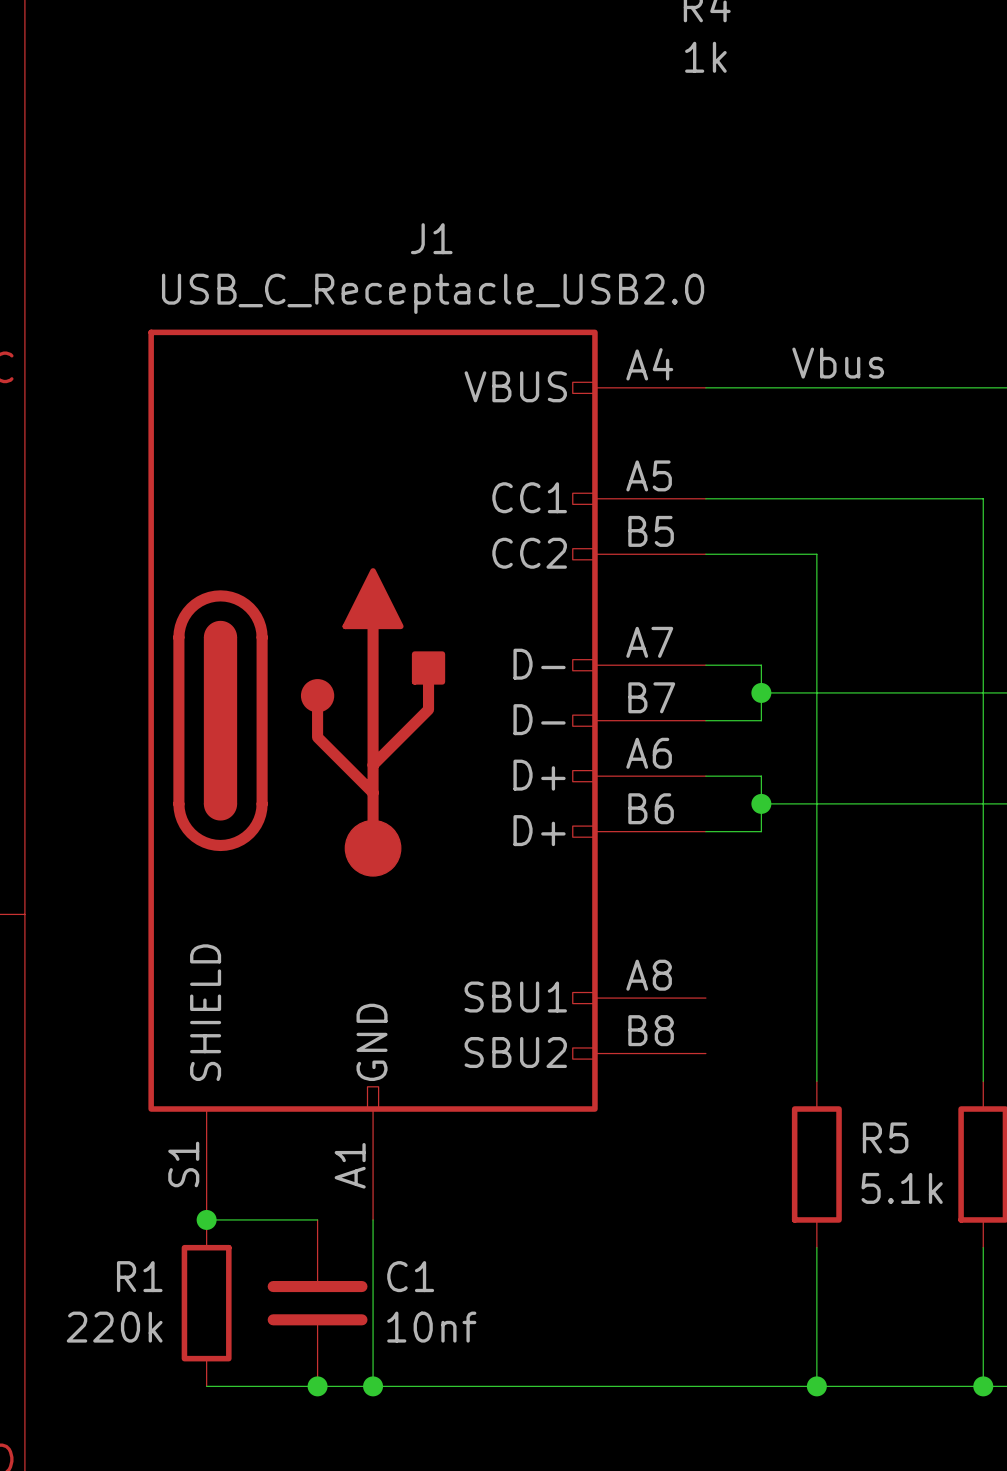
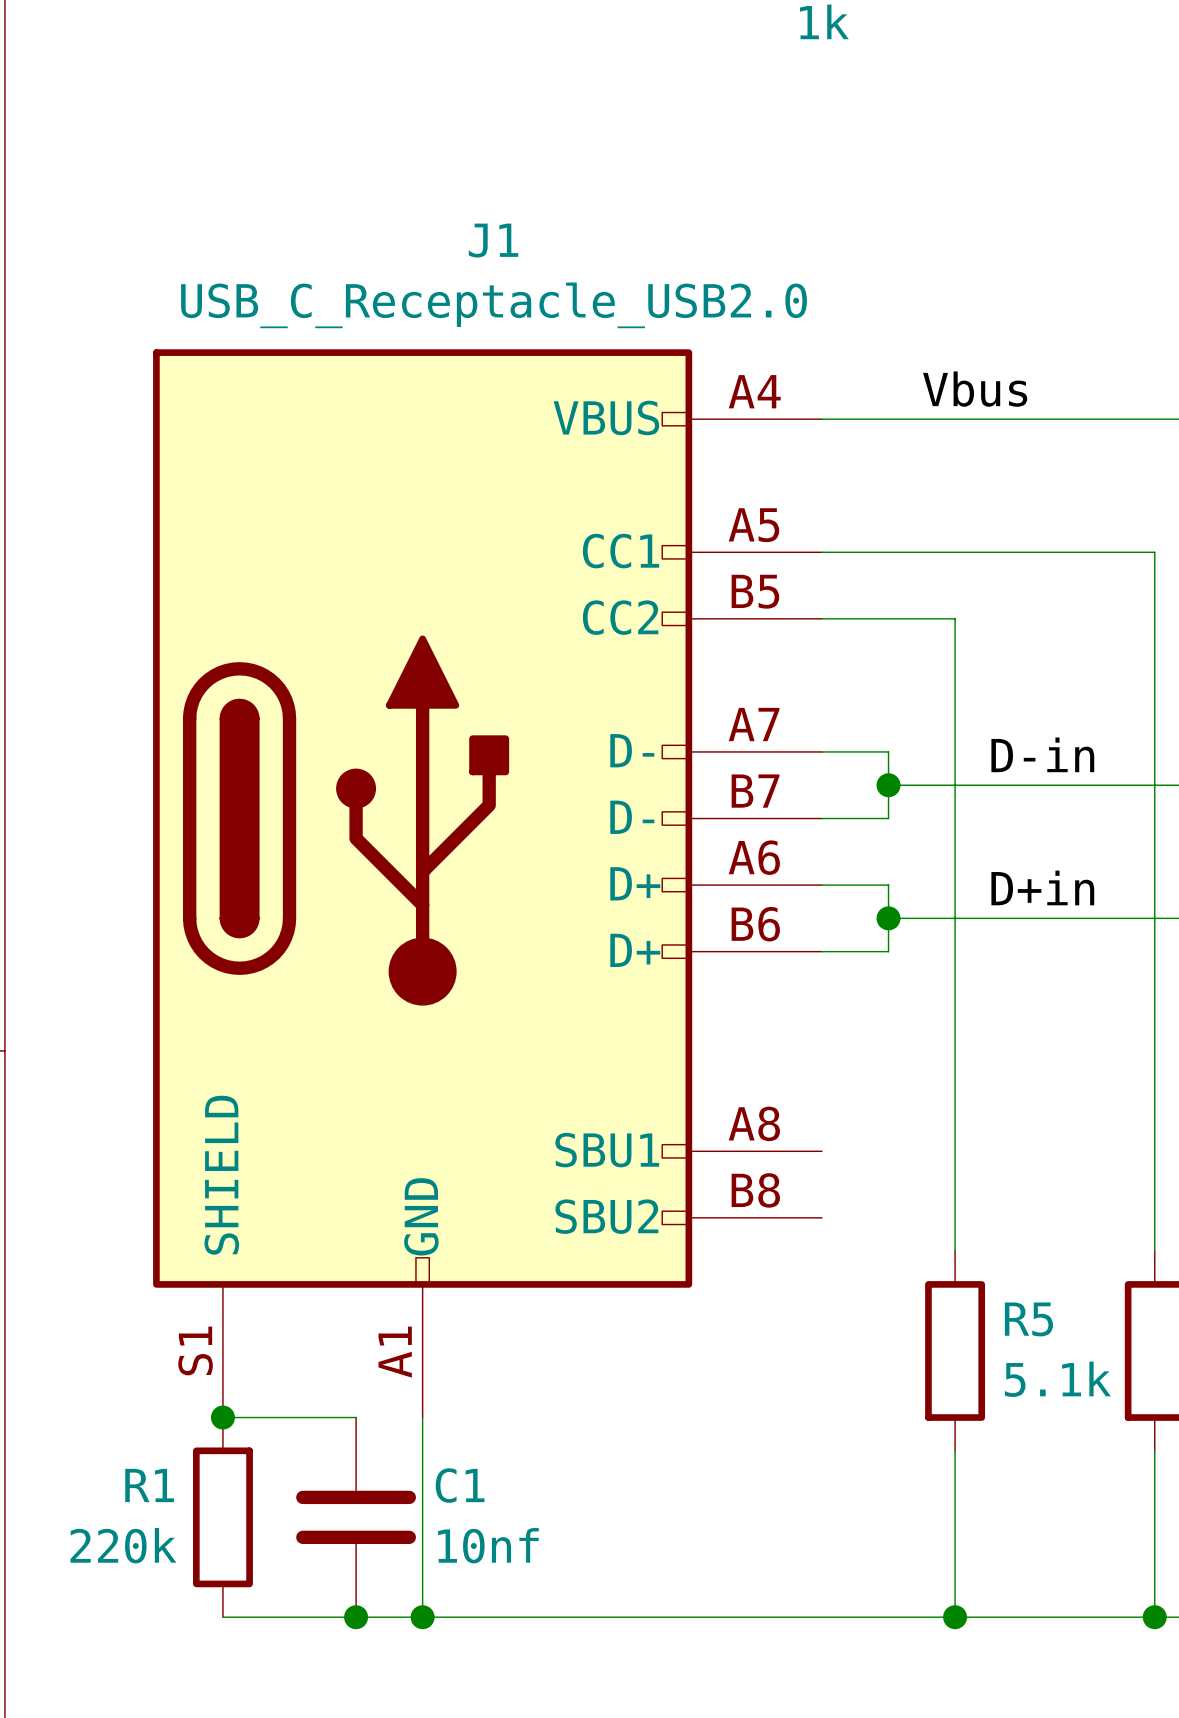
label: none -> D-in (1042, 754)
label: none -> D+in (1042, 887)

